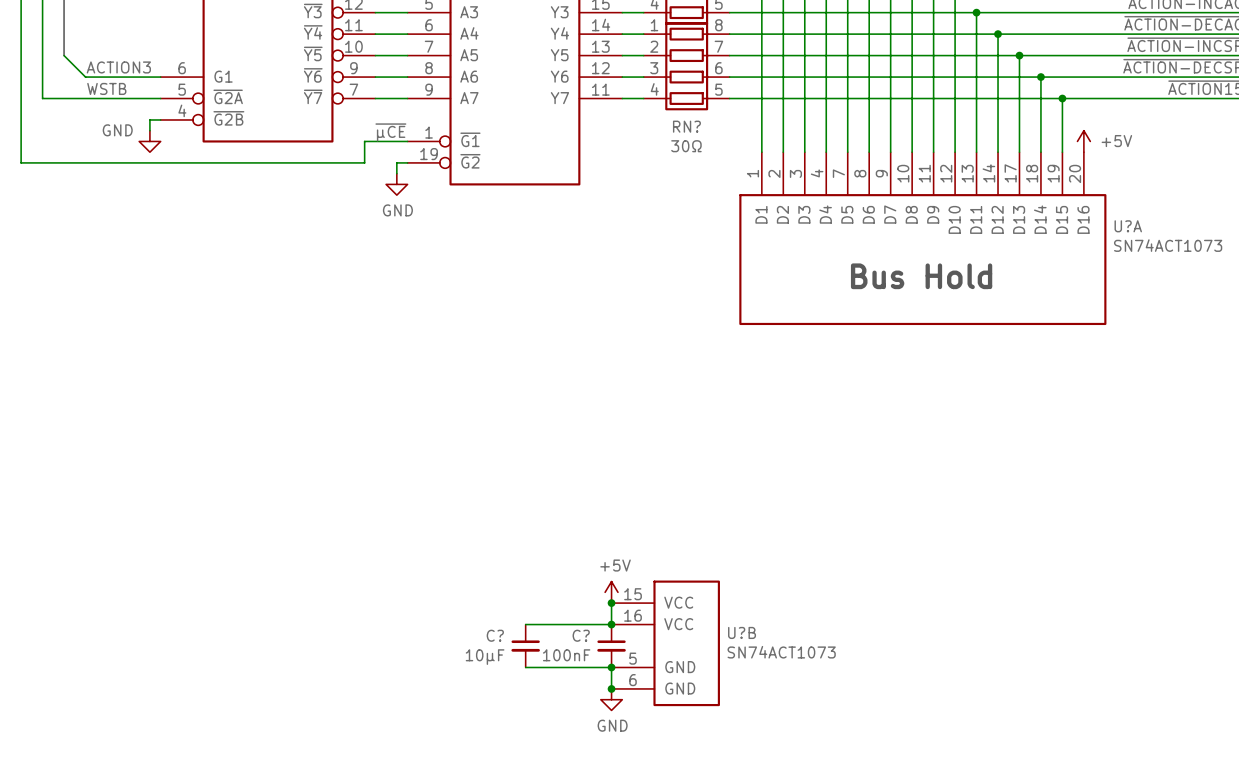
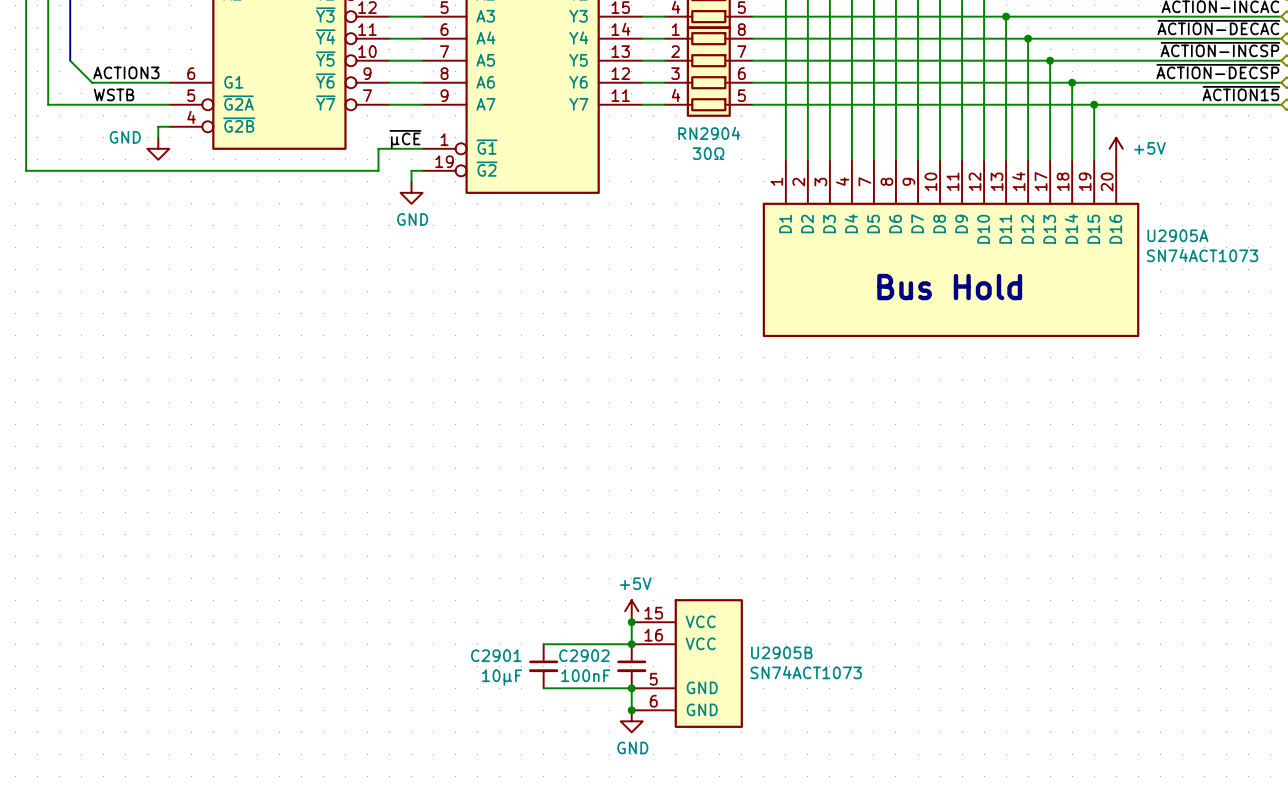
RN? name: RN? (686, 126) -> RN2904 (709, 133)
U?A name: U?A (1128, 226) -> U2905A (1177, 235)
U?B name: U?B (742, 632) -> U2905B (781, 652)
C? name: C? (495, 635) -> C2901 (496, 655)
C? name: C? (581, 635) -> C2902 (584, 655)

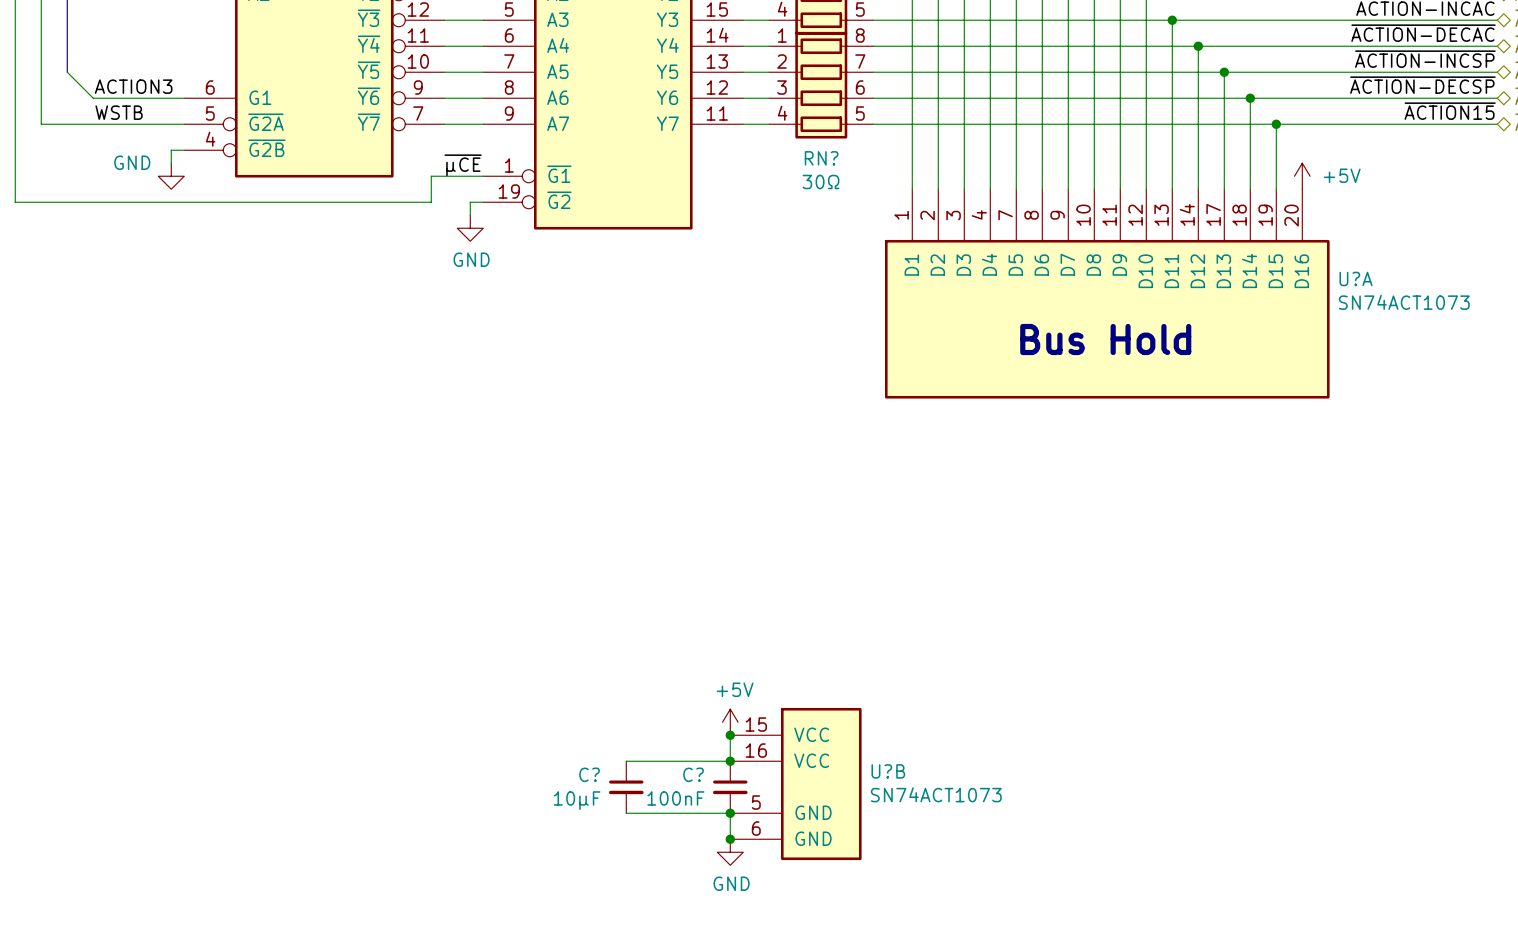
RN2904 name: RN2904 (709, 133) -> RN? (821, 158)
U2905A name: U2905A (1177, 235) -> U?A (1356, 278)
U2905B name: U2905B (781, 652) -> U?B (888, 771)
C2901 name: C2901 (496, 655) -> C? (589, 774)
C2902 name: C2902 (584, 655) -> C? (693, 774)

